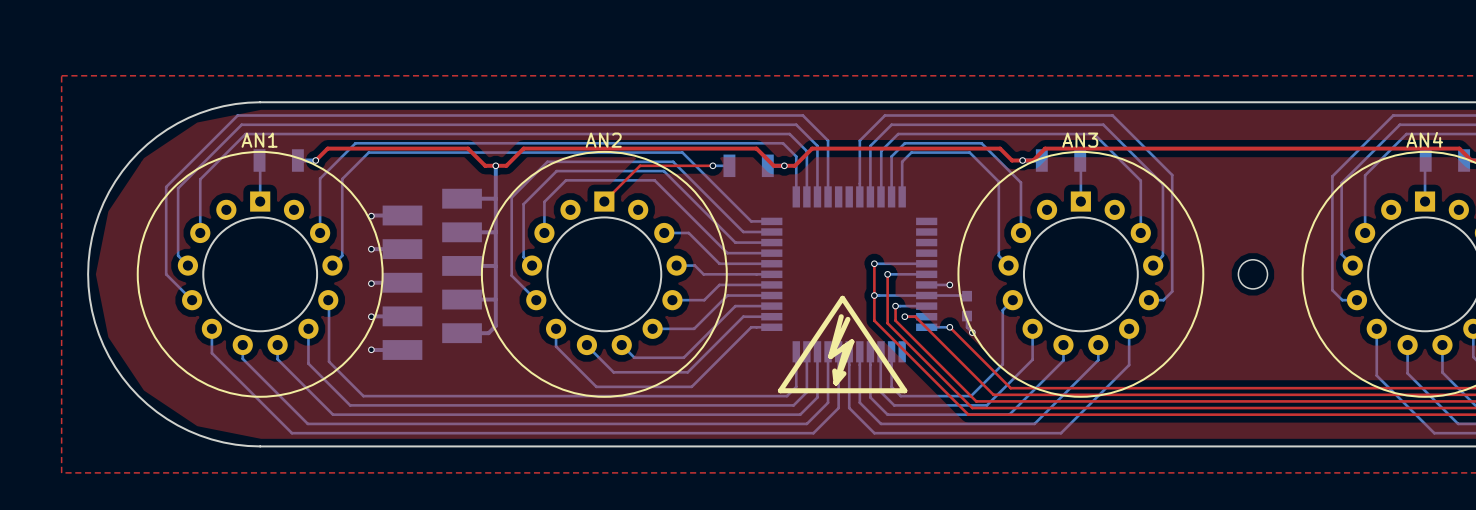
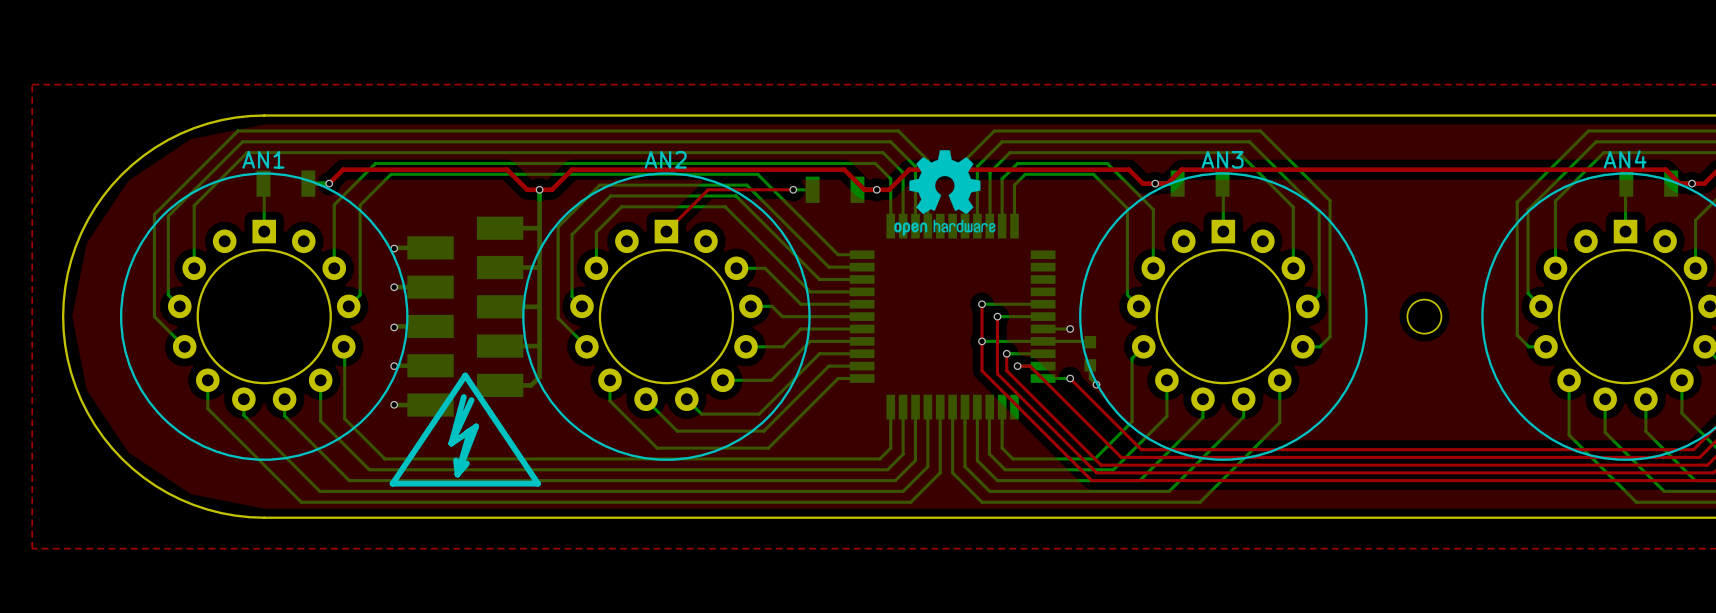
drawing: none -> [894, 150, 996, 236]
drawing: [777, 295, 908, 394] -> none
drawing: none -> [389, 372, 541, 487]

